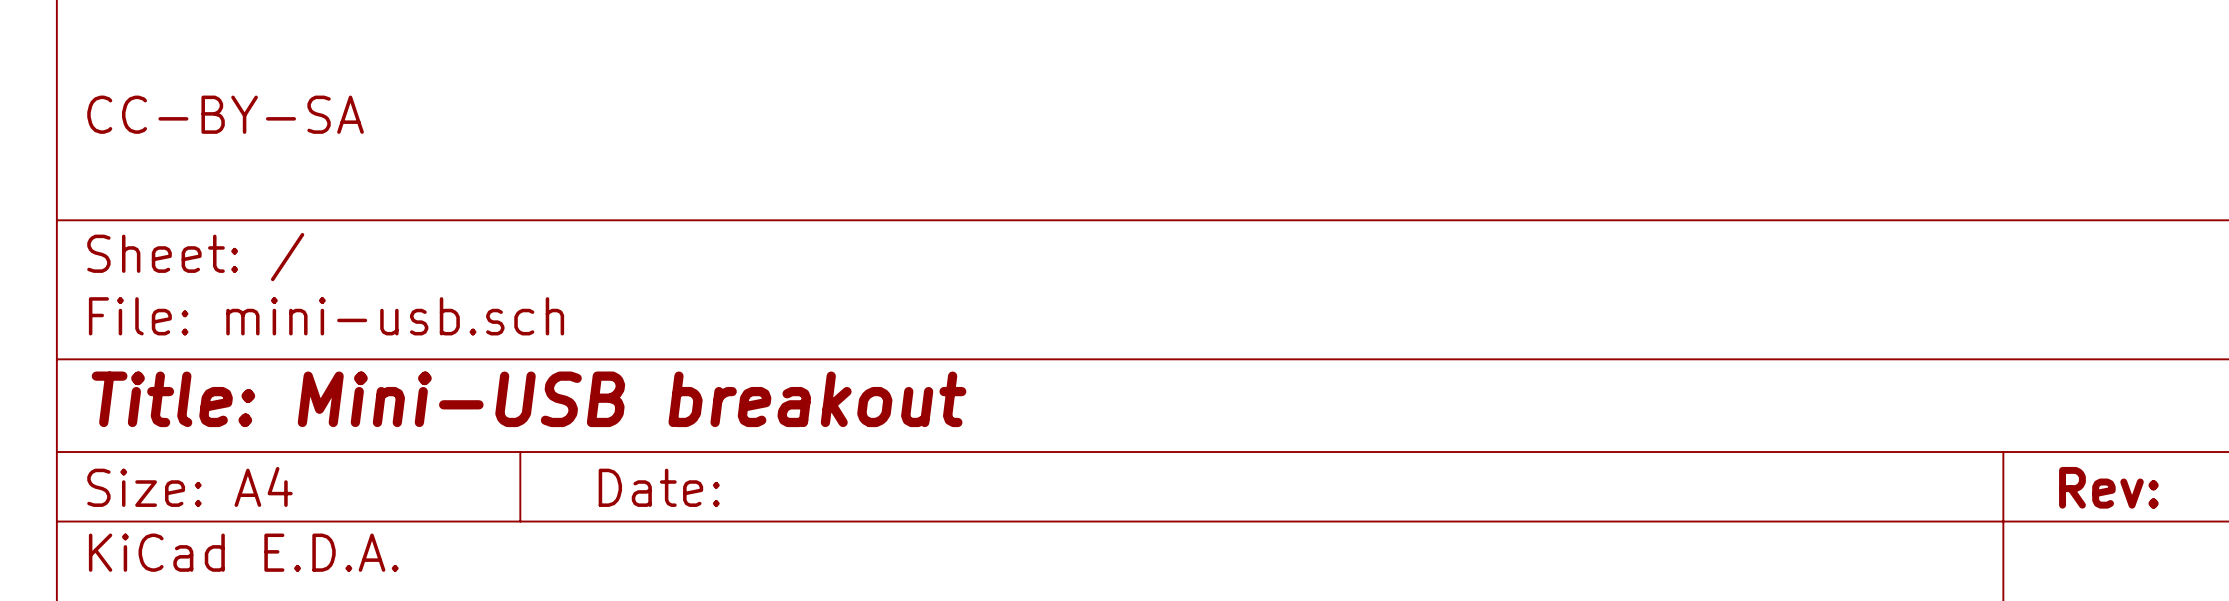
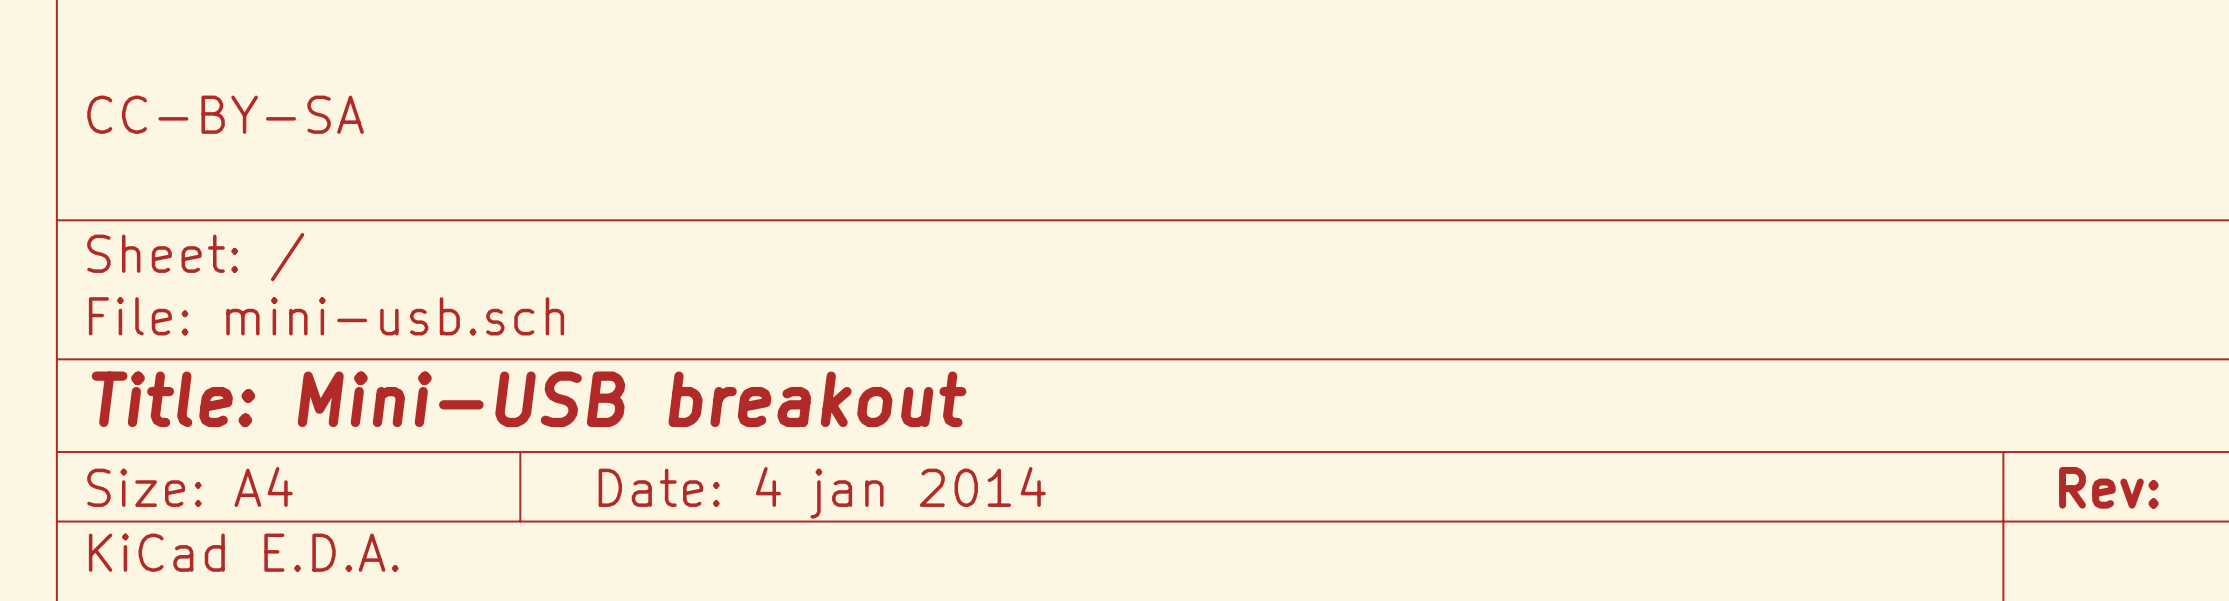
title block: Date: (659, 487) -> Date: 4 jan 2014 (822, 492)

